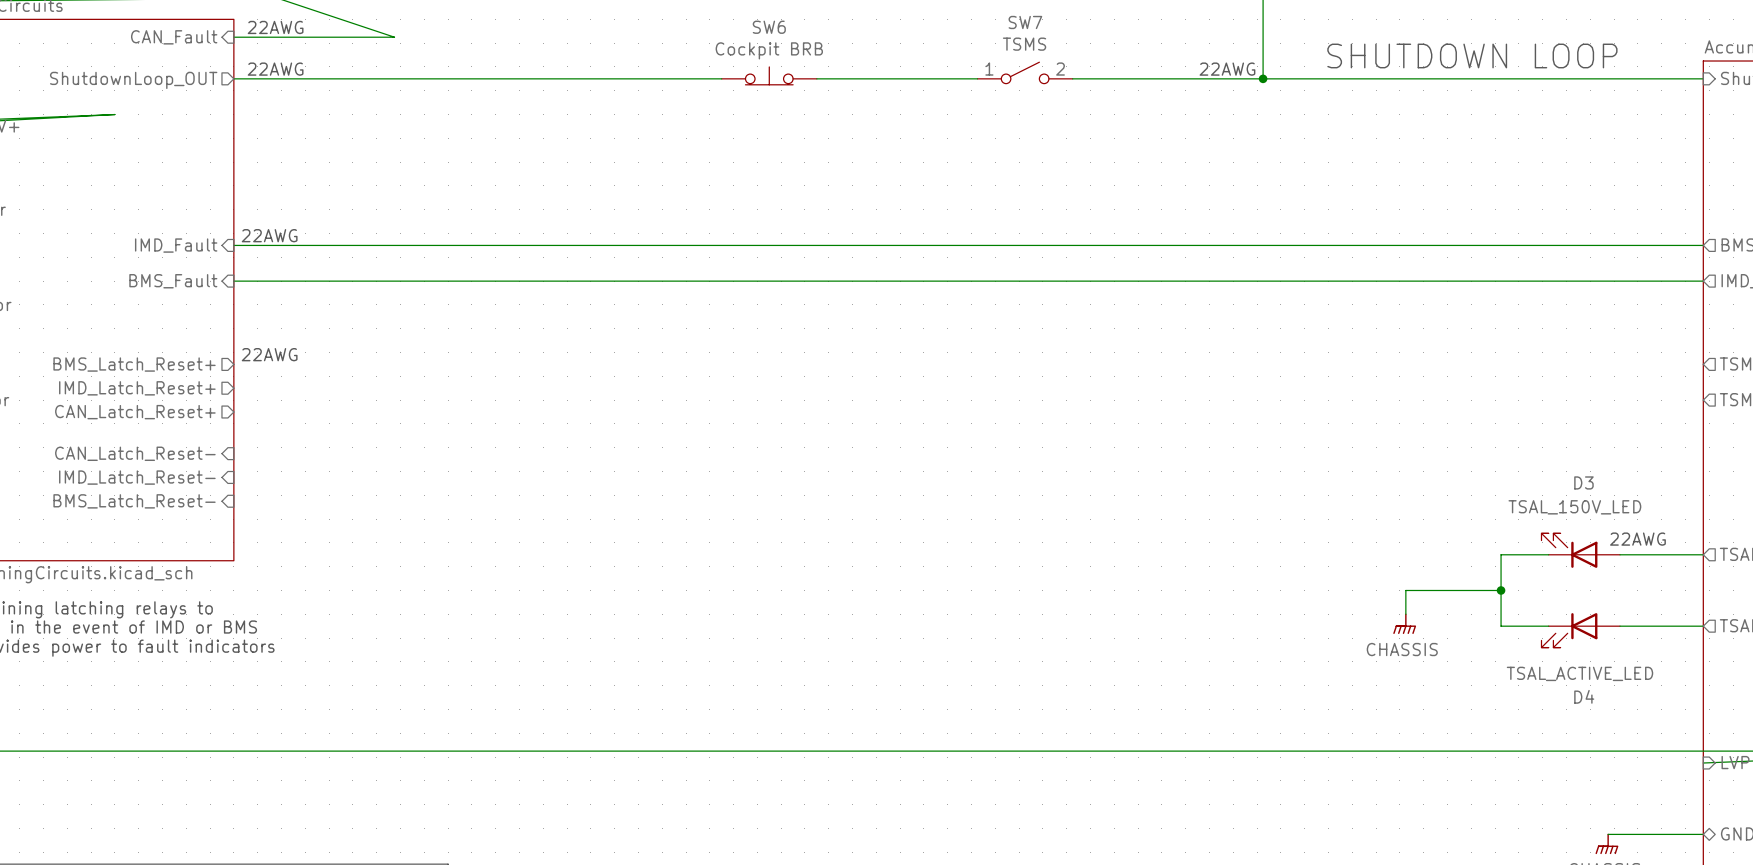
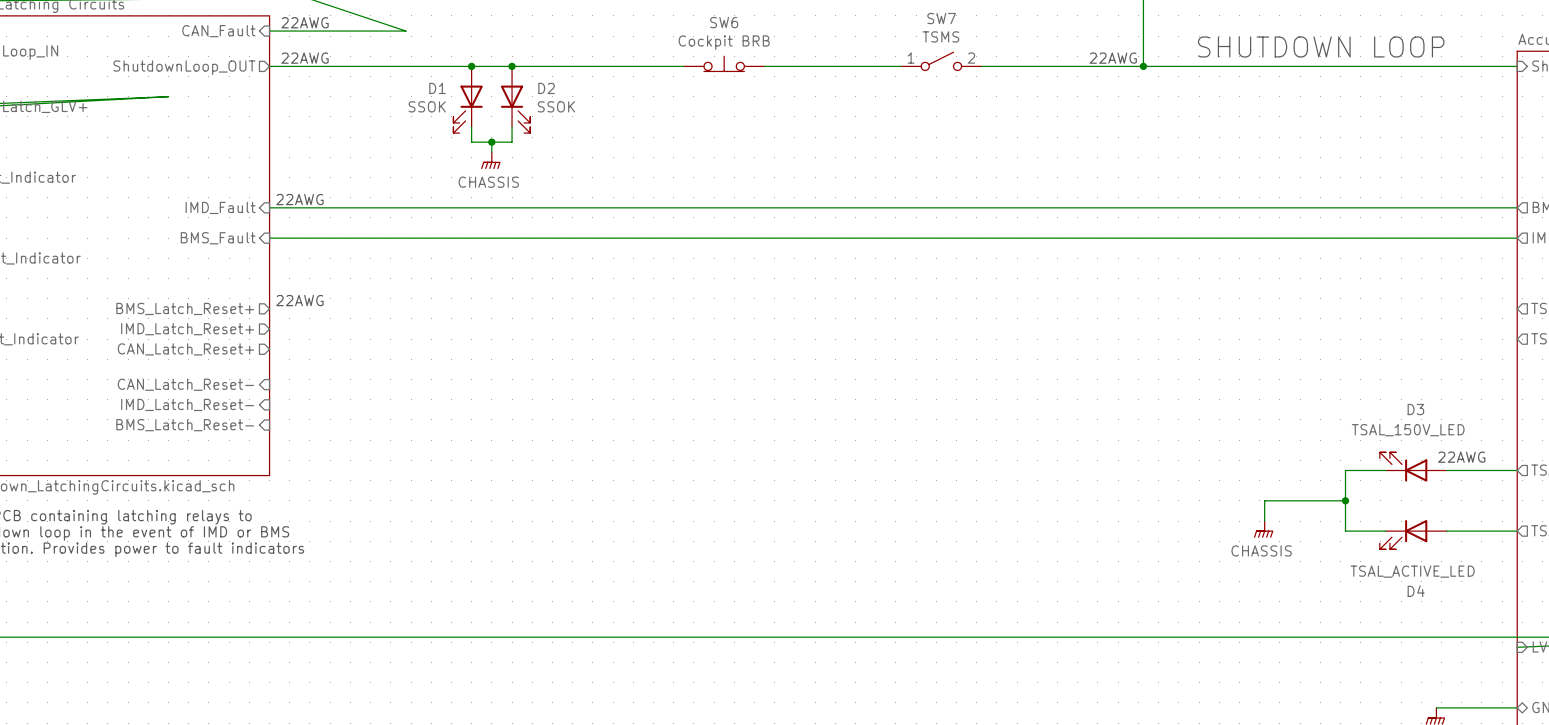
junction: none -> (471, 66)
junction: none -> (512, 66)
D1: none -> SSOK (468, 99)
D2: none -> SSOK (515, 99)
wire: none -> (471, 127) (471, 142) (512, 142) (512, 127)
wire: none -> (491, 142) (491, 152)
junction: none -> (491, 142)
part: none -> CHASSIS (490, 160)

